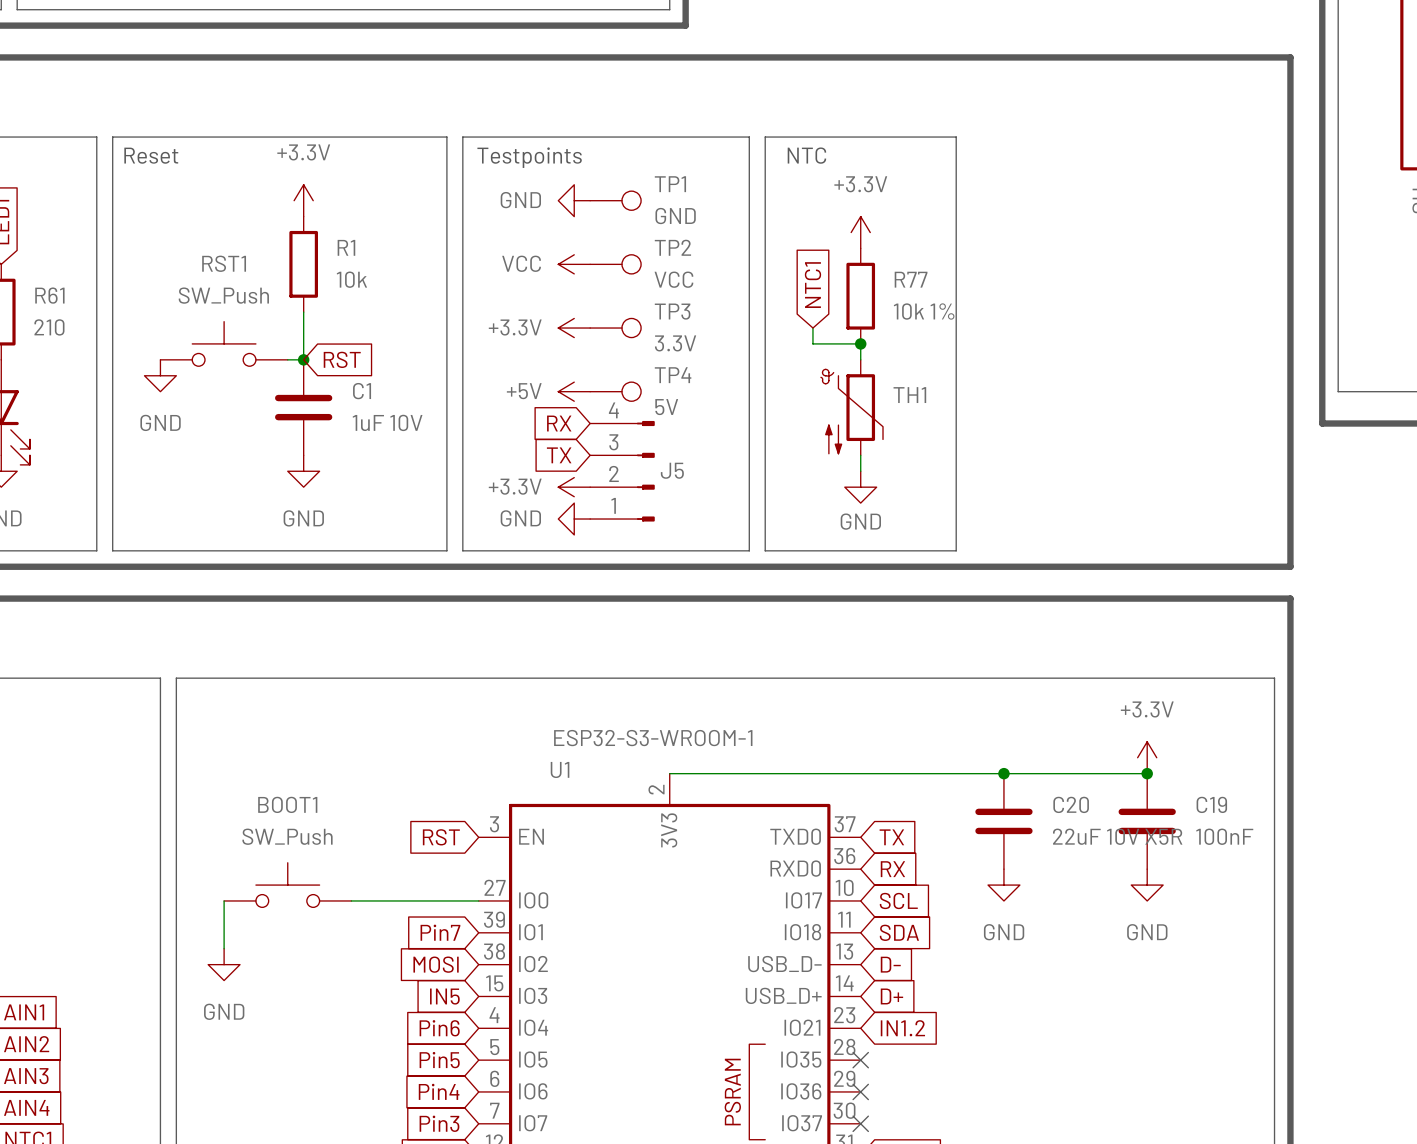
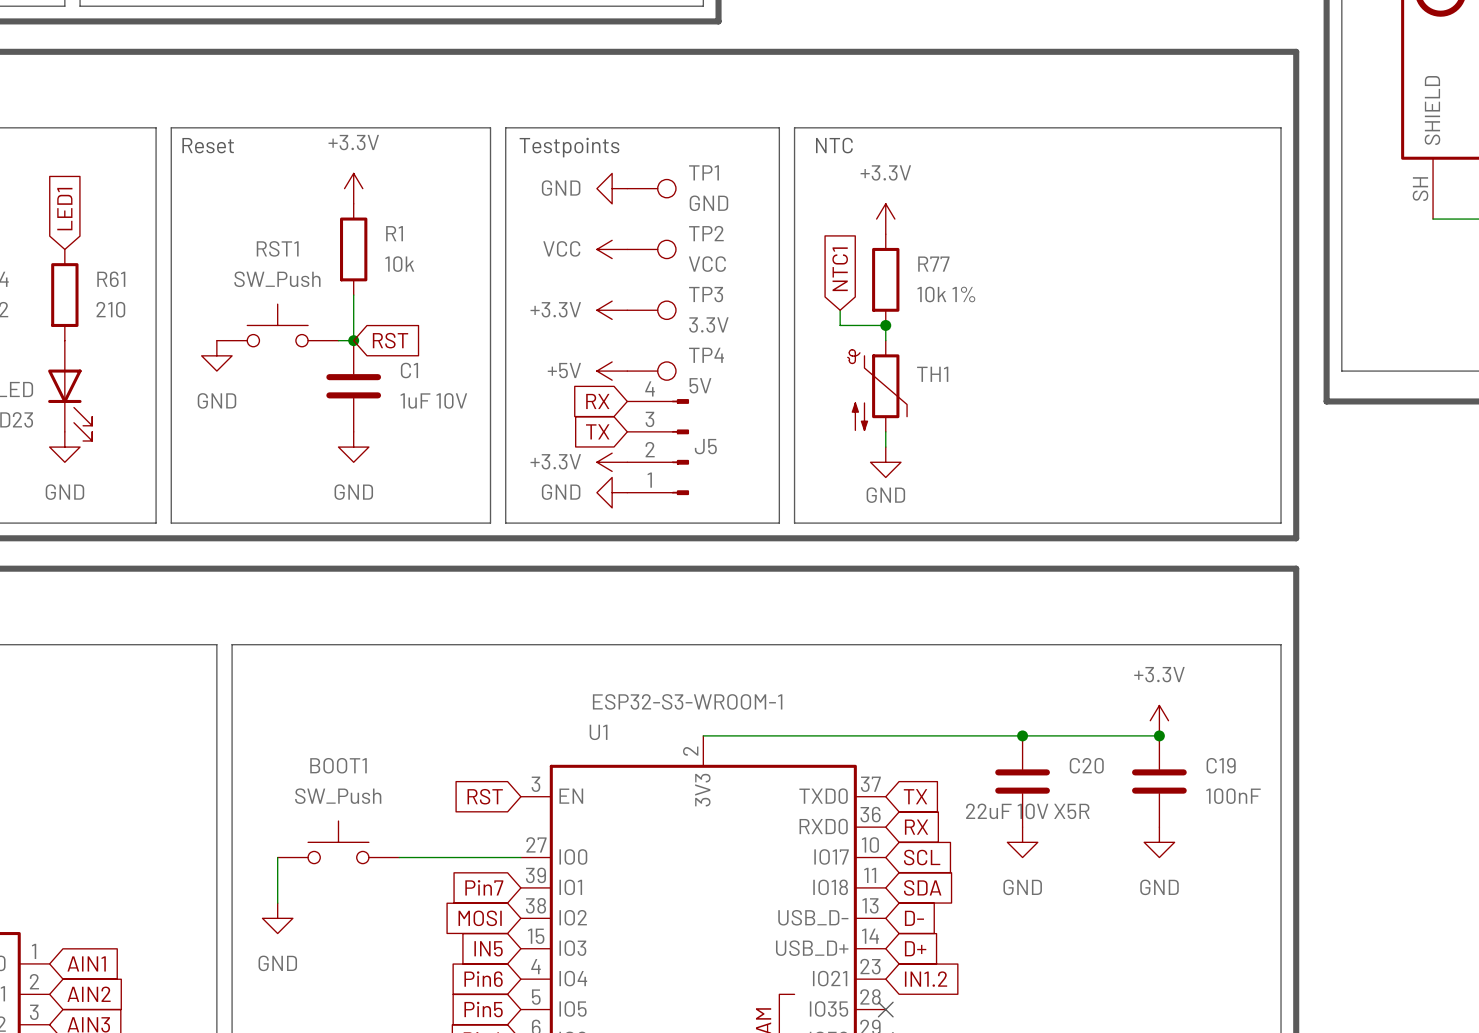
line: (956, 137) (956, 550) -> (976, 127) (1281, 127) (1281, 523) (976, 523)
C20 value position: 22uF 10V X5R (1117, 836) -> 22uF 10V X5R (1027, 811)

